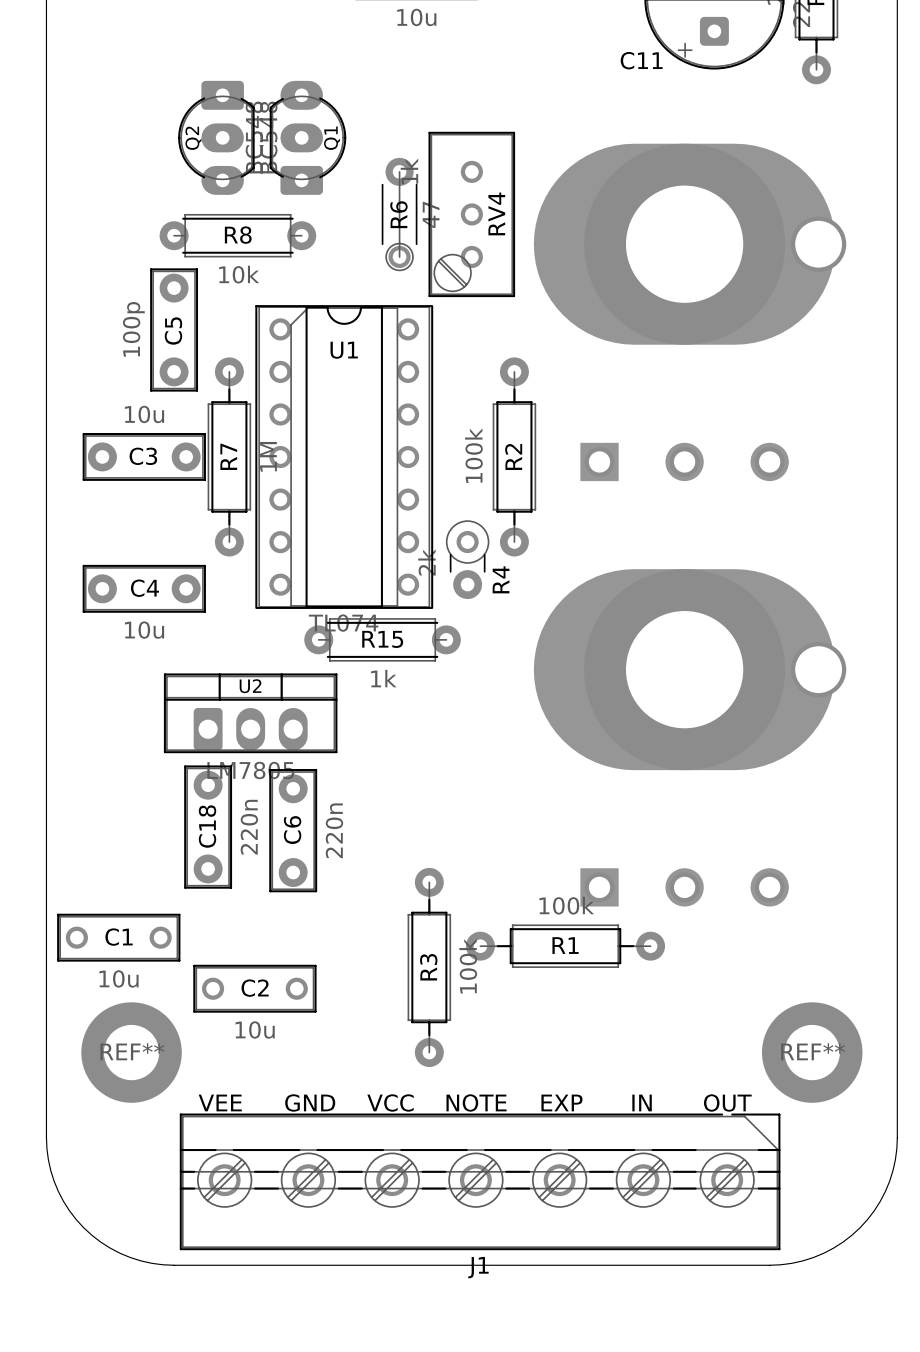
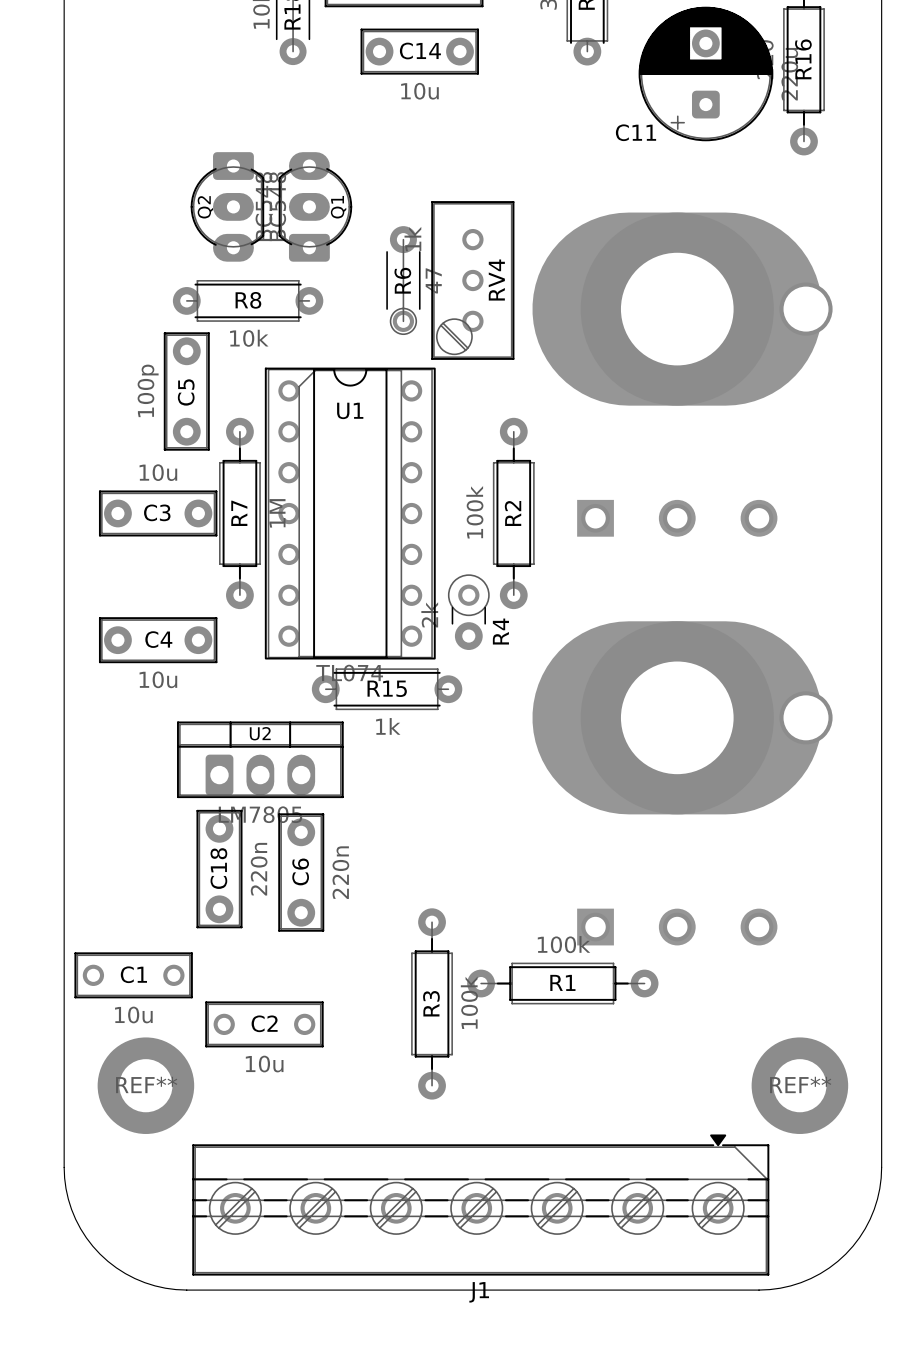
text: VEE (220, 1102) -> none
text: GND (310, 1102) -> none
text: VCC (390, 1102) -> none
text: NOTE (476, 1102) -> none
text: EXP (561, 1102) -> none
text: IN (642, 1102) -> none
text: OUT (727, 1102) -> none
J1 footprint: [179, 1113, 781, 1251] -> [192, 1134, 770, 1276]

